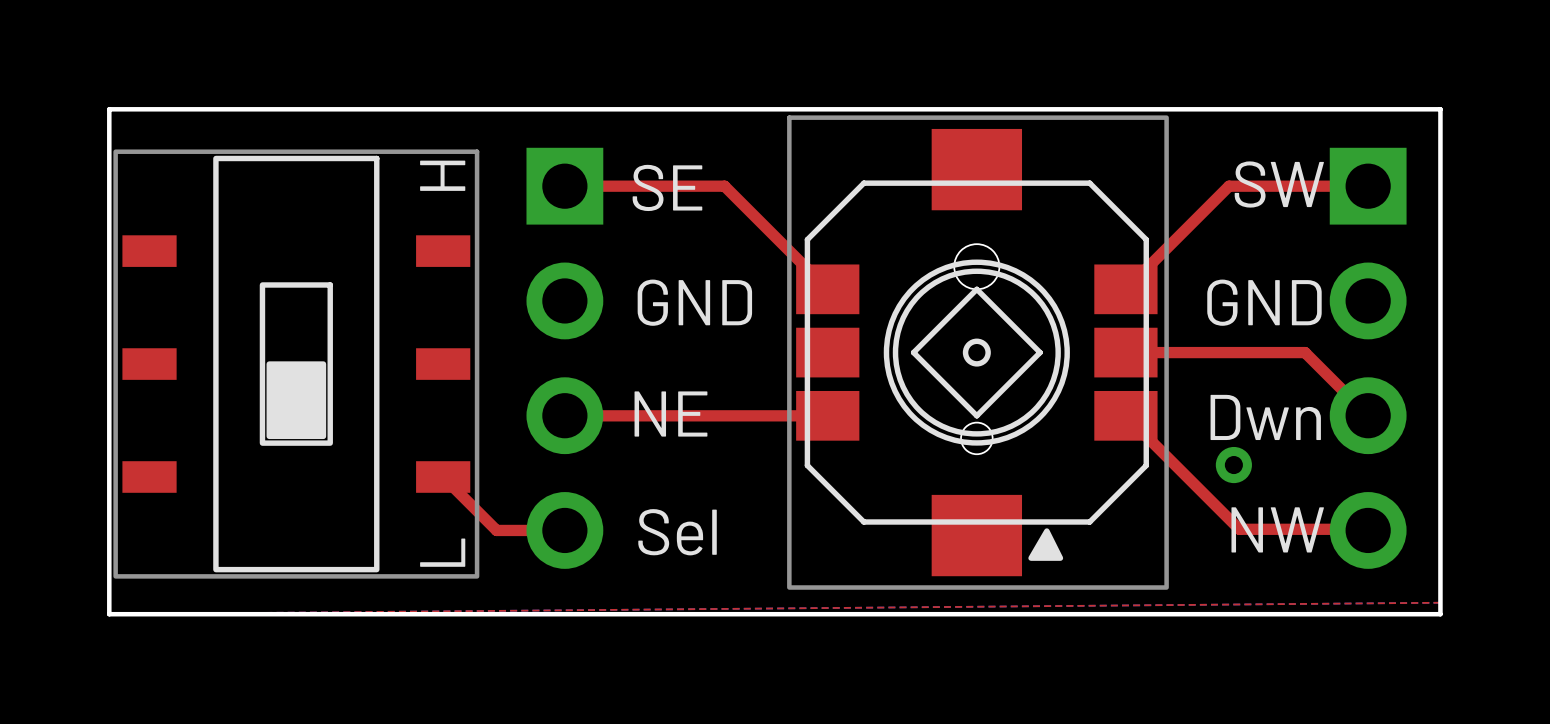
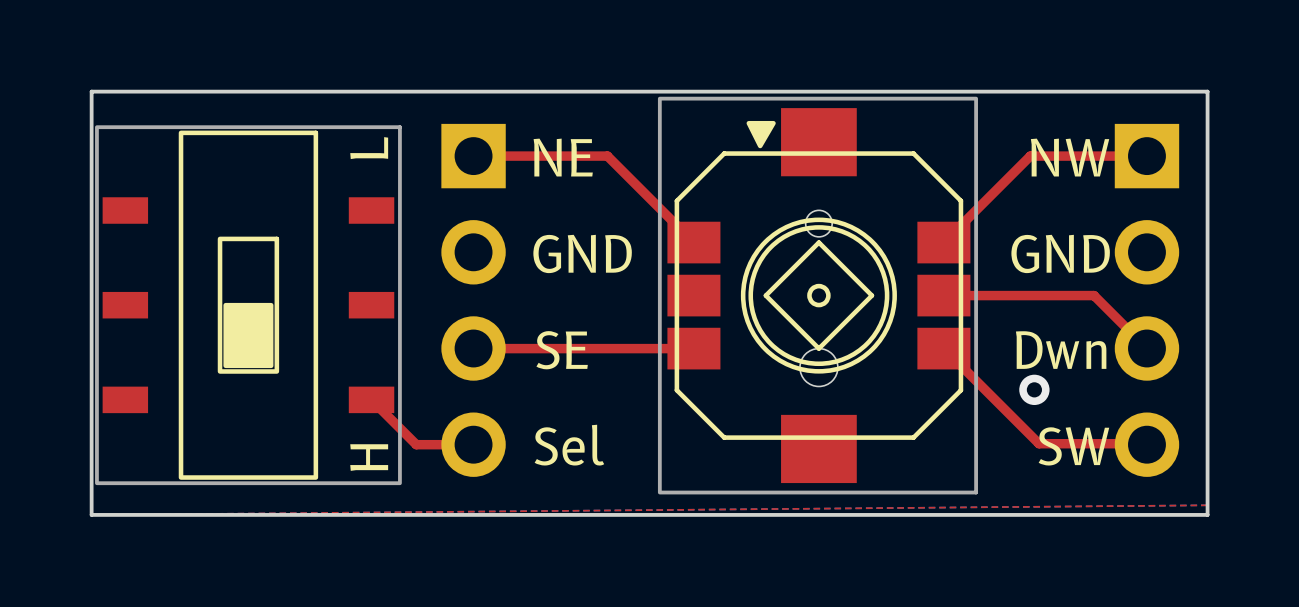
text: H (442, 175) -> L (369, 148)
text: SW (1279, 184) -> NW (1070, 157)
text: SE (667, 187) -> NE (563, 157)
part rotation: 0° (977, 352) -> 180° (817, 295)
text: NE (670, 414) -> SE (562, 350)
text: NW (1277, 529) -> SW (1073, 446)
text: L (442, 552) -> H (369, 457)

